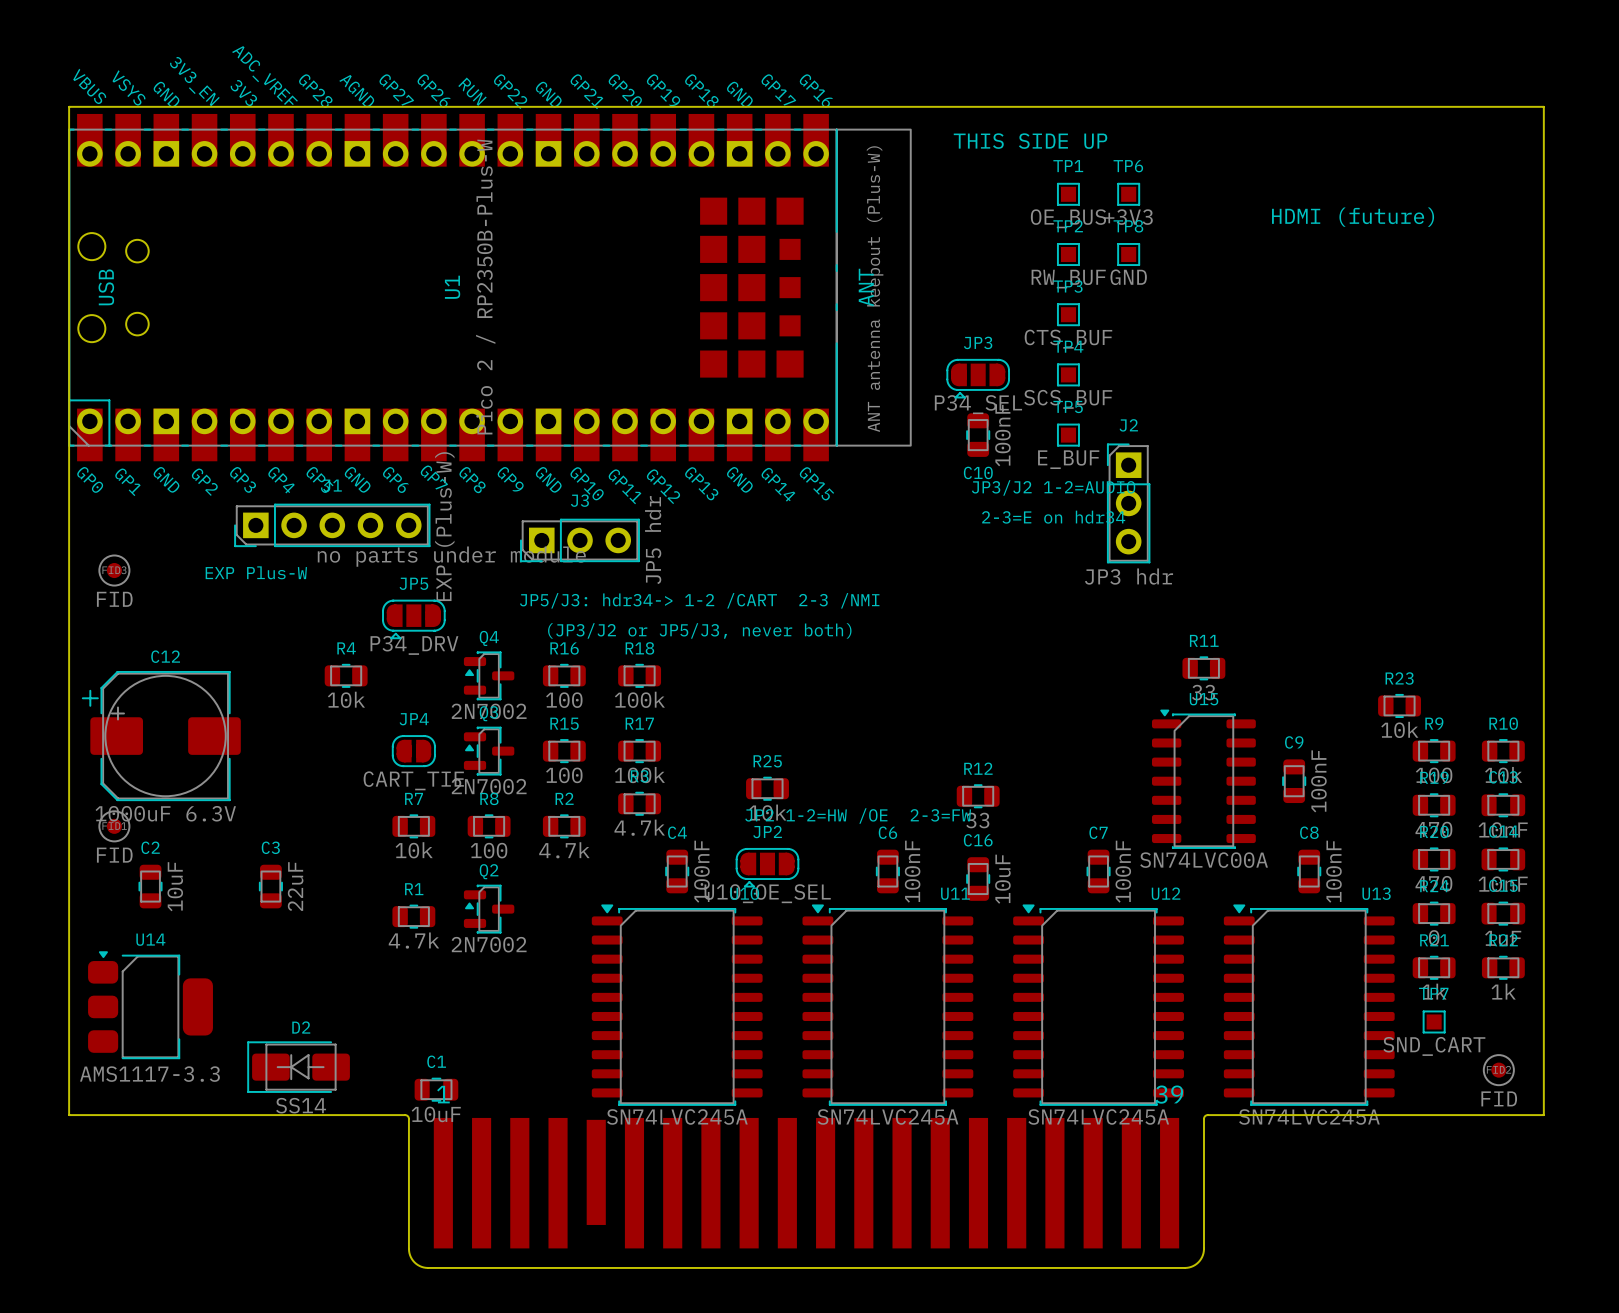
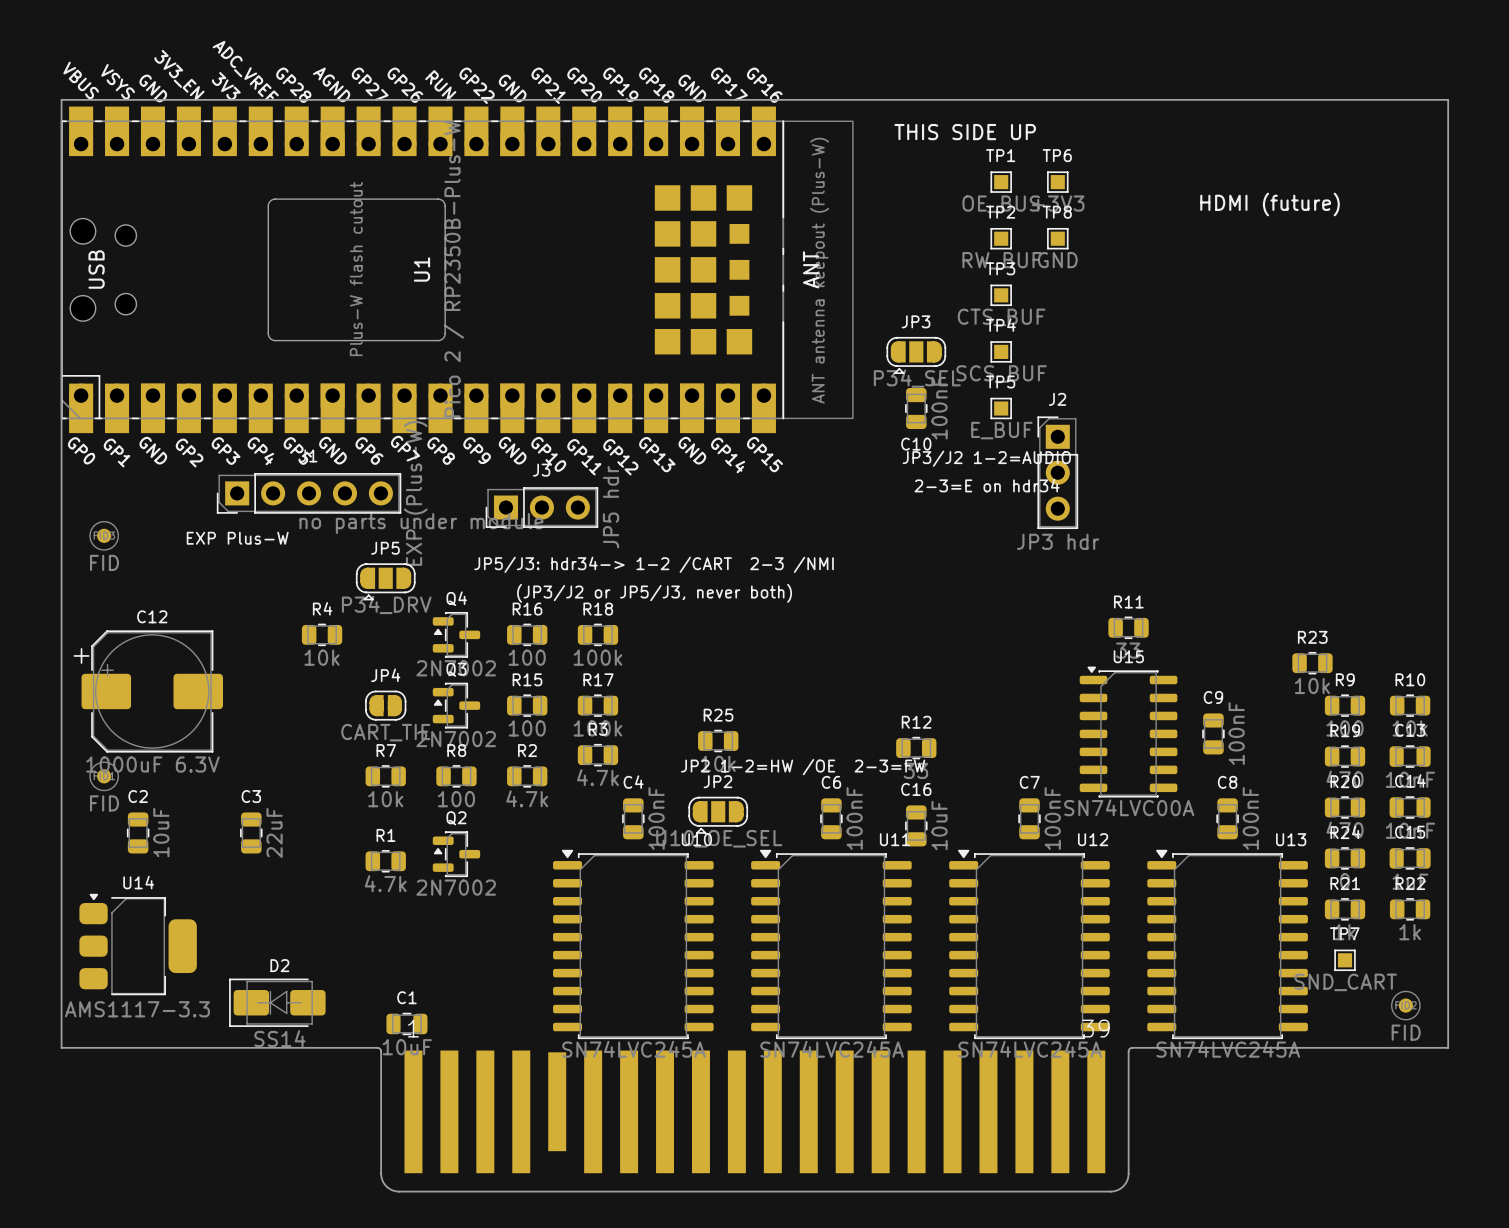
U1 footprint: [68, 113, 912, 462] -> [60, 106, 854, 434]

